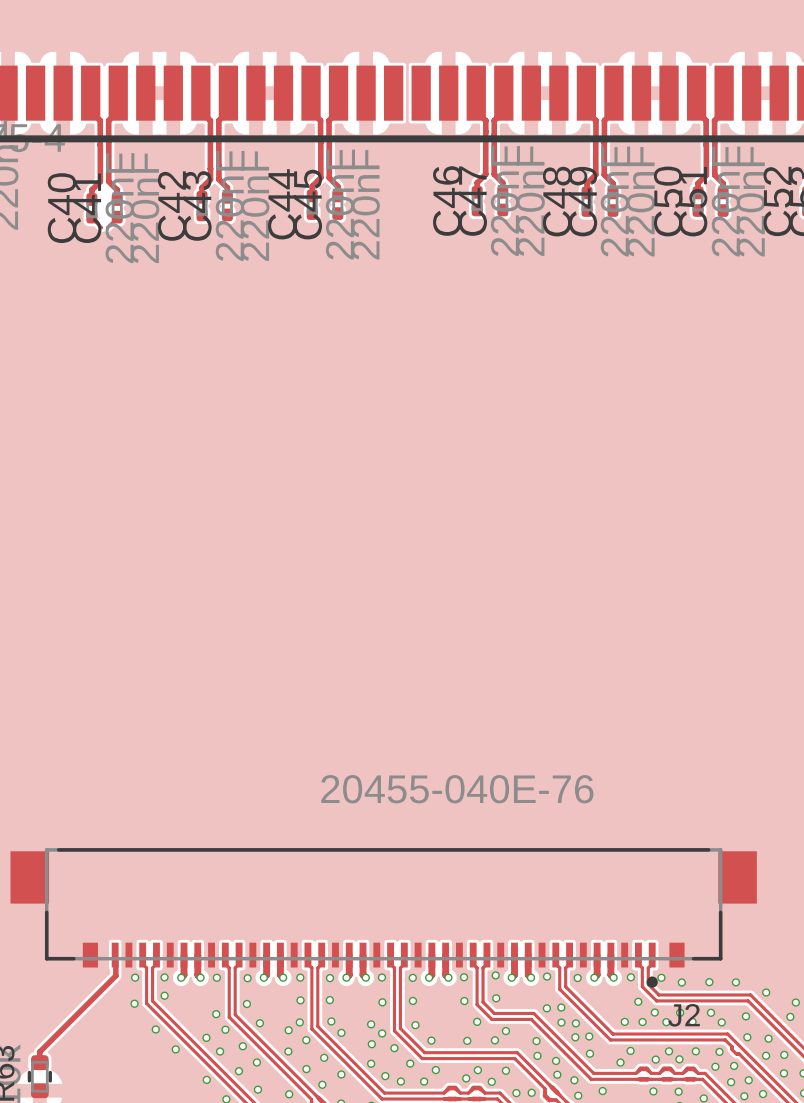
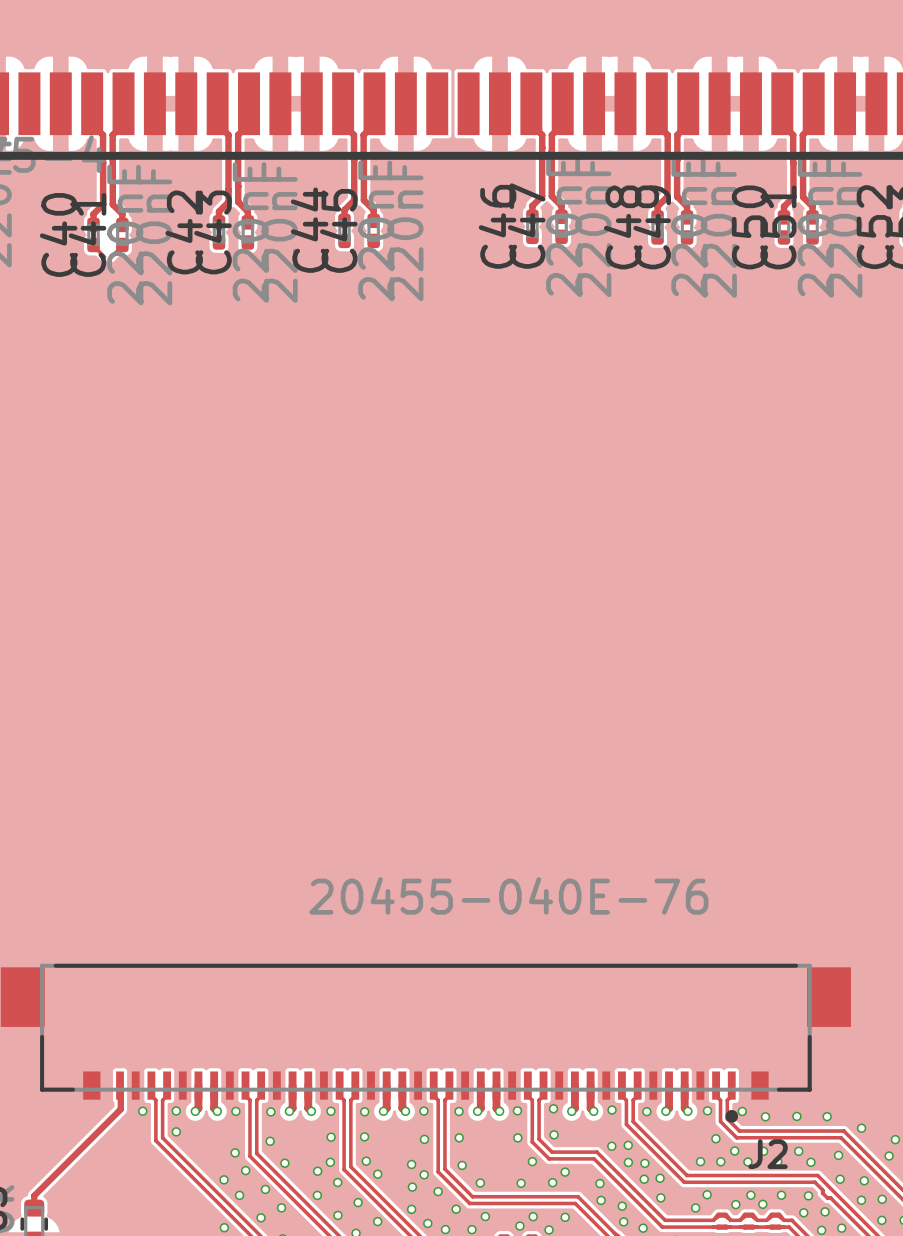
via: (134, 1003) -> none
via: (155, 1029) -> none
via: (175, 1049) -> none

